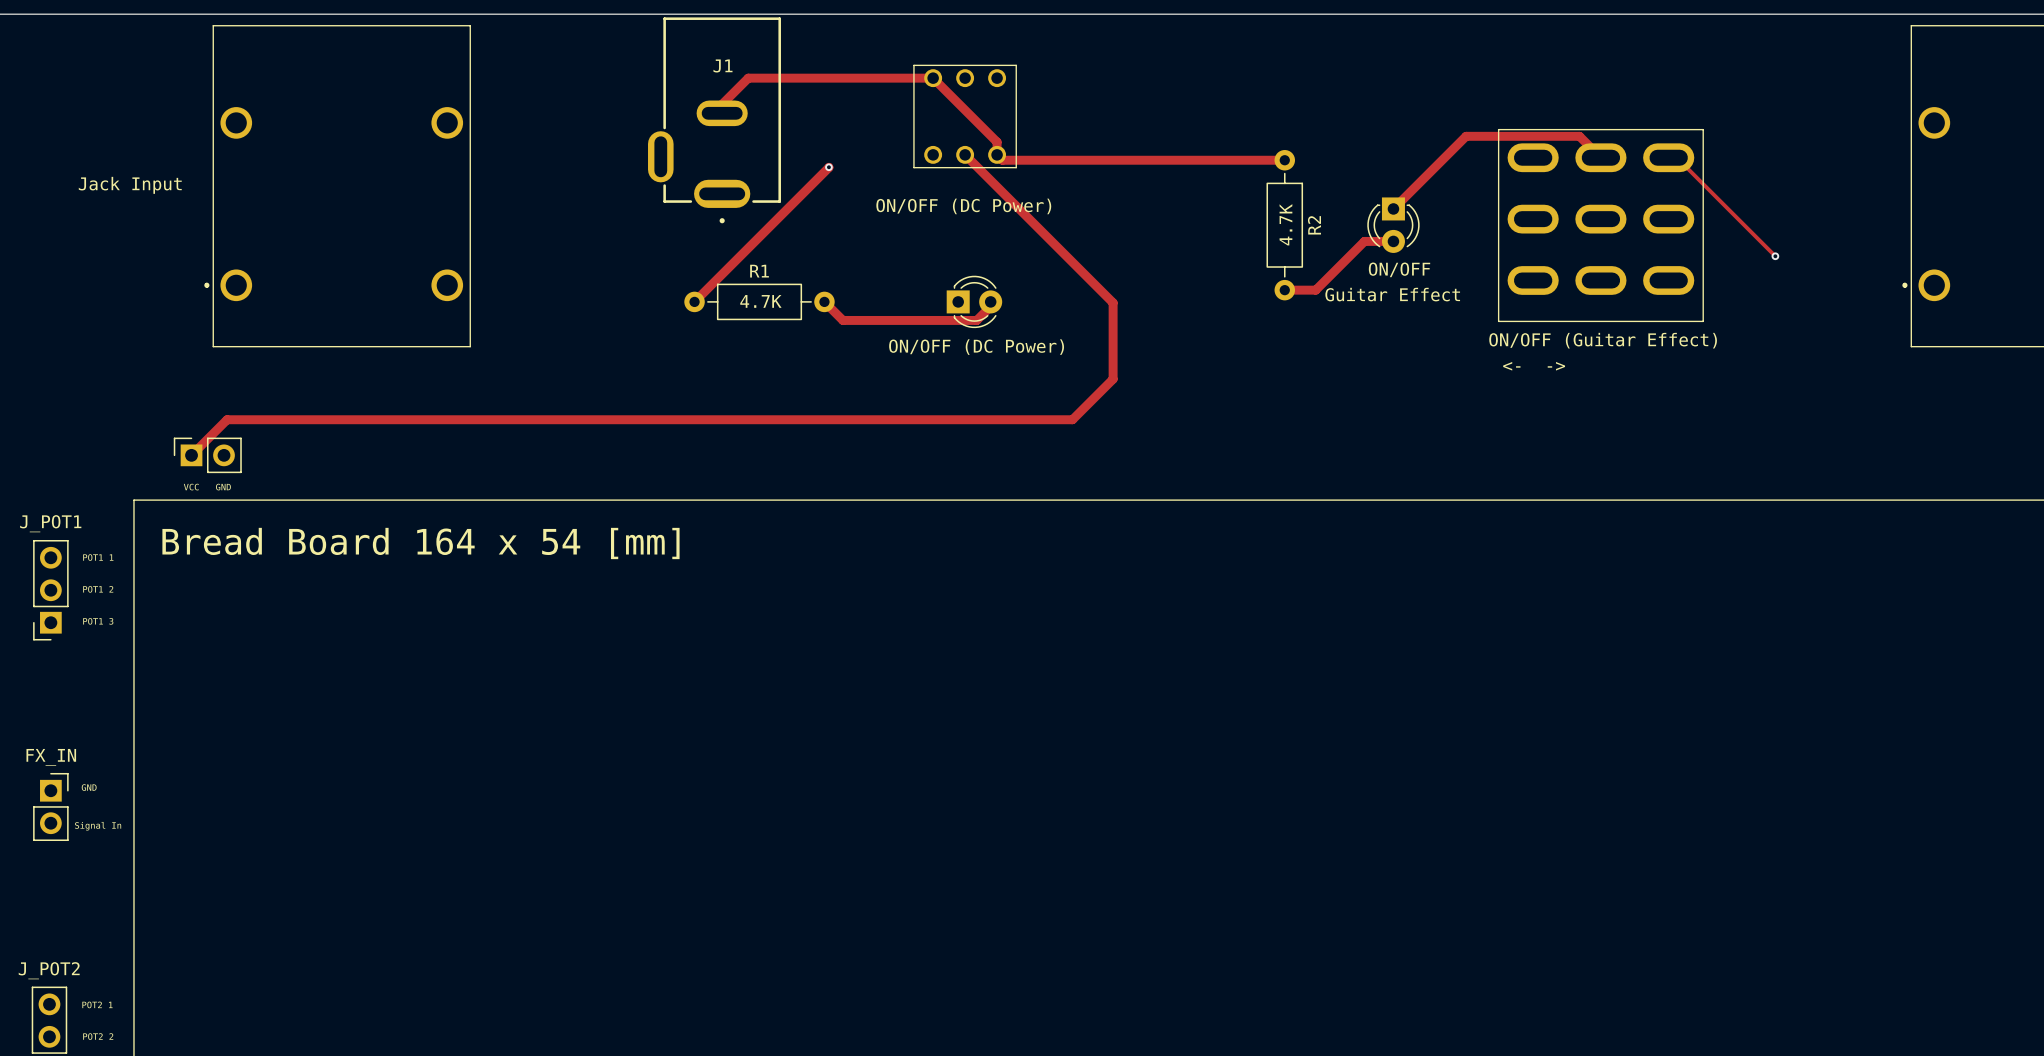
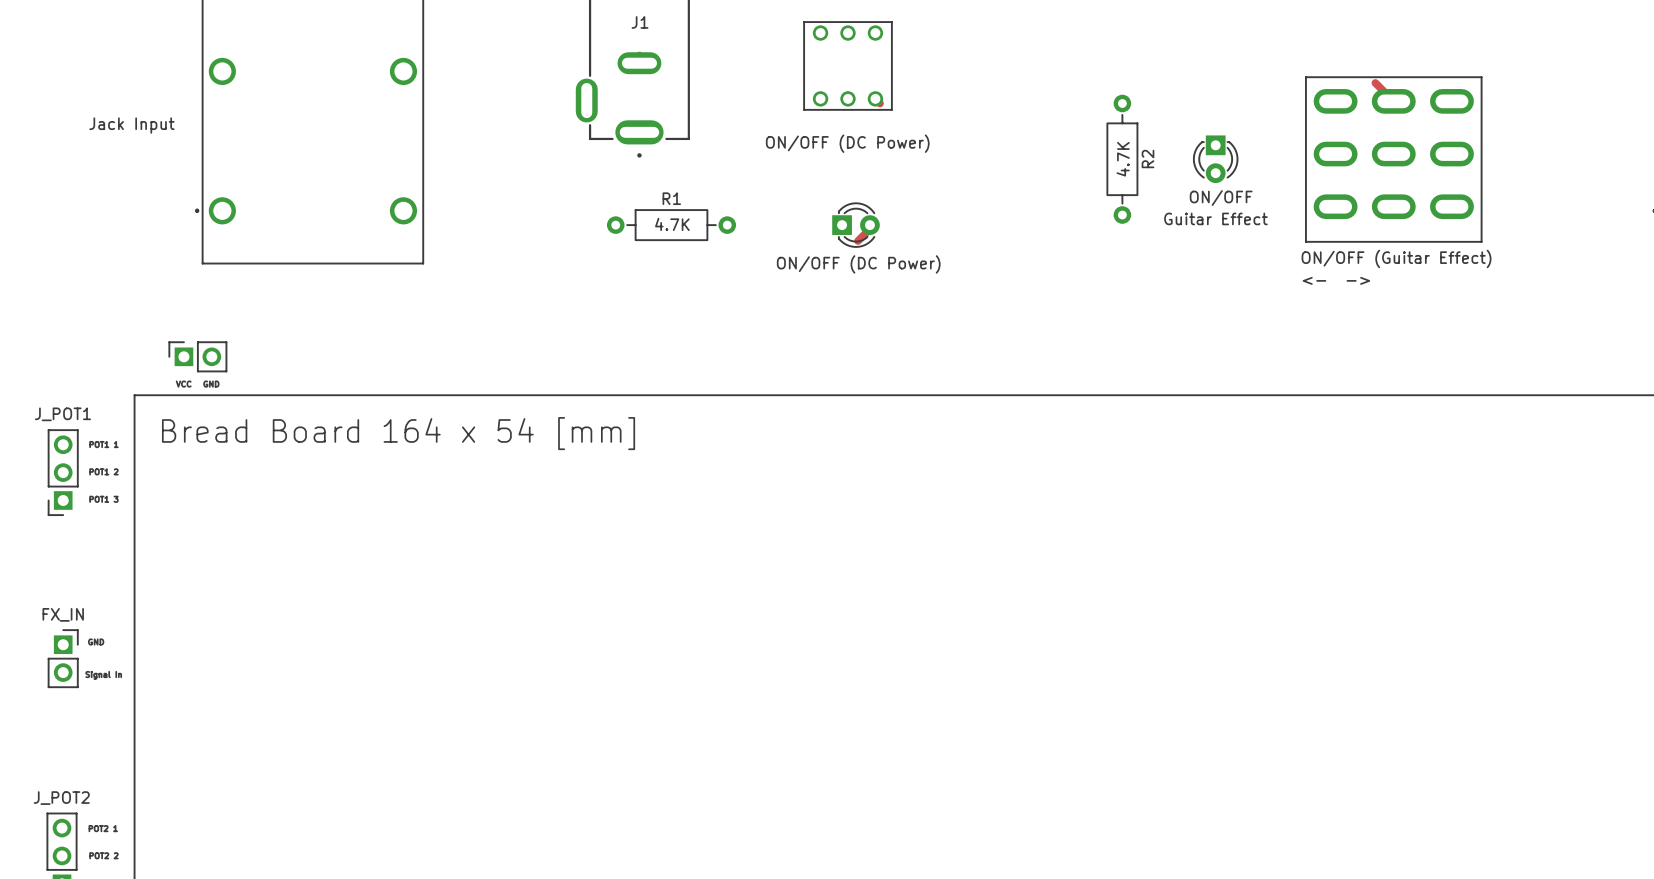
track: (722, 104) (748, 78) (933, 78) (997, 142) (997, 154) -> none
track: (1579, 136) (1466, 136) (1393, 208) -> none
track: (965, 154) (1113, 302) (1113, 379) (1072, 419) (227, 419) (191, 455) -> none
track: (1676, 157) (1775, 256) -> none
track: (1002, 160) (1284, 160) -> none
track: (828, 167) (694, 301) -> none
via: (828, 167) -> none
track: (1393, 241) (1364, 241) (1315, 290) (1284, 290) -> none
via: (1775, 256) -> none
track: (824, 301) (843, 320) (976, 320) -> none

